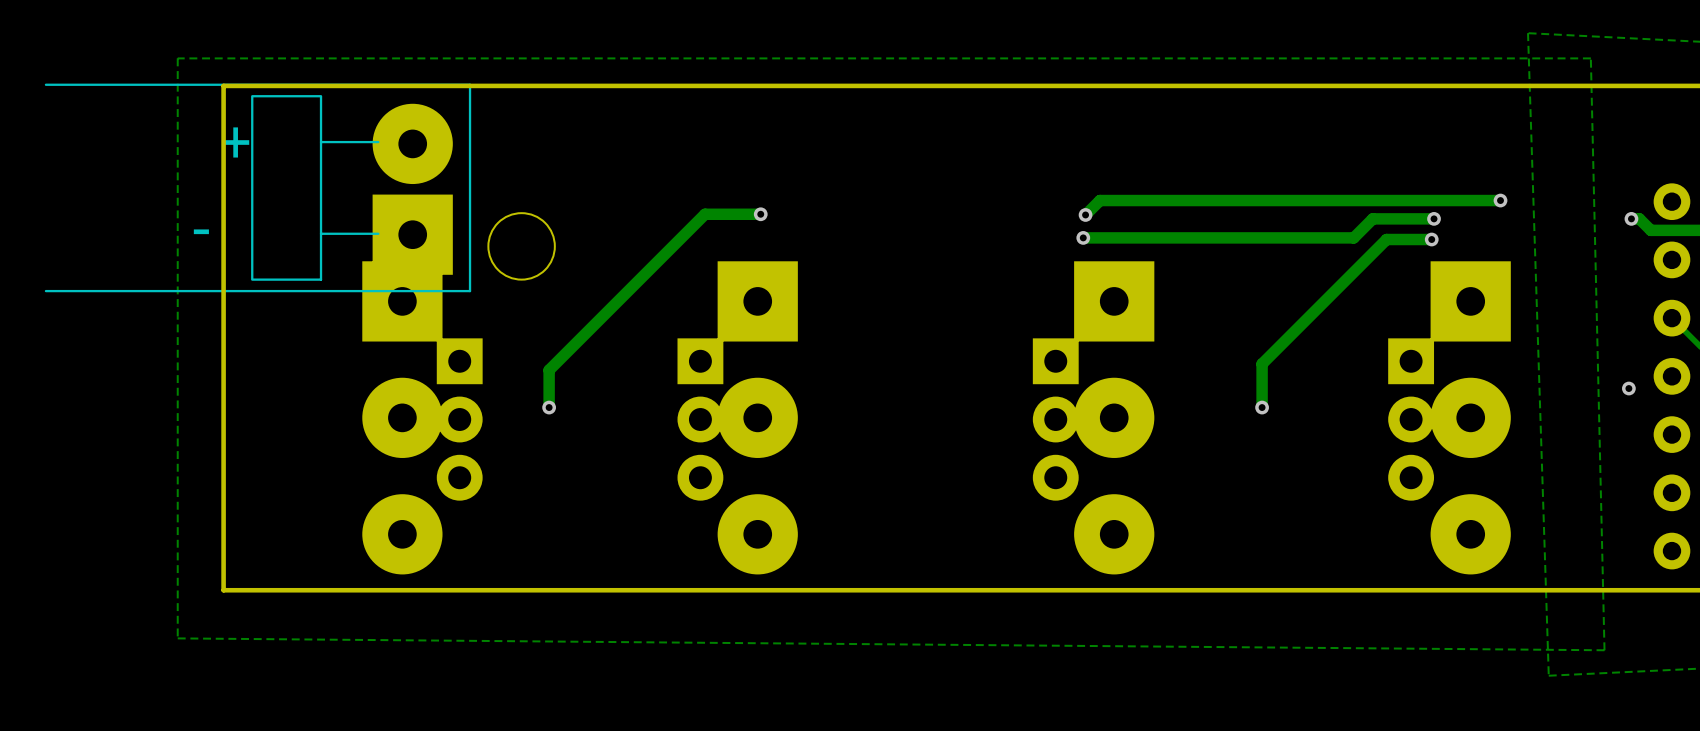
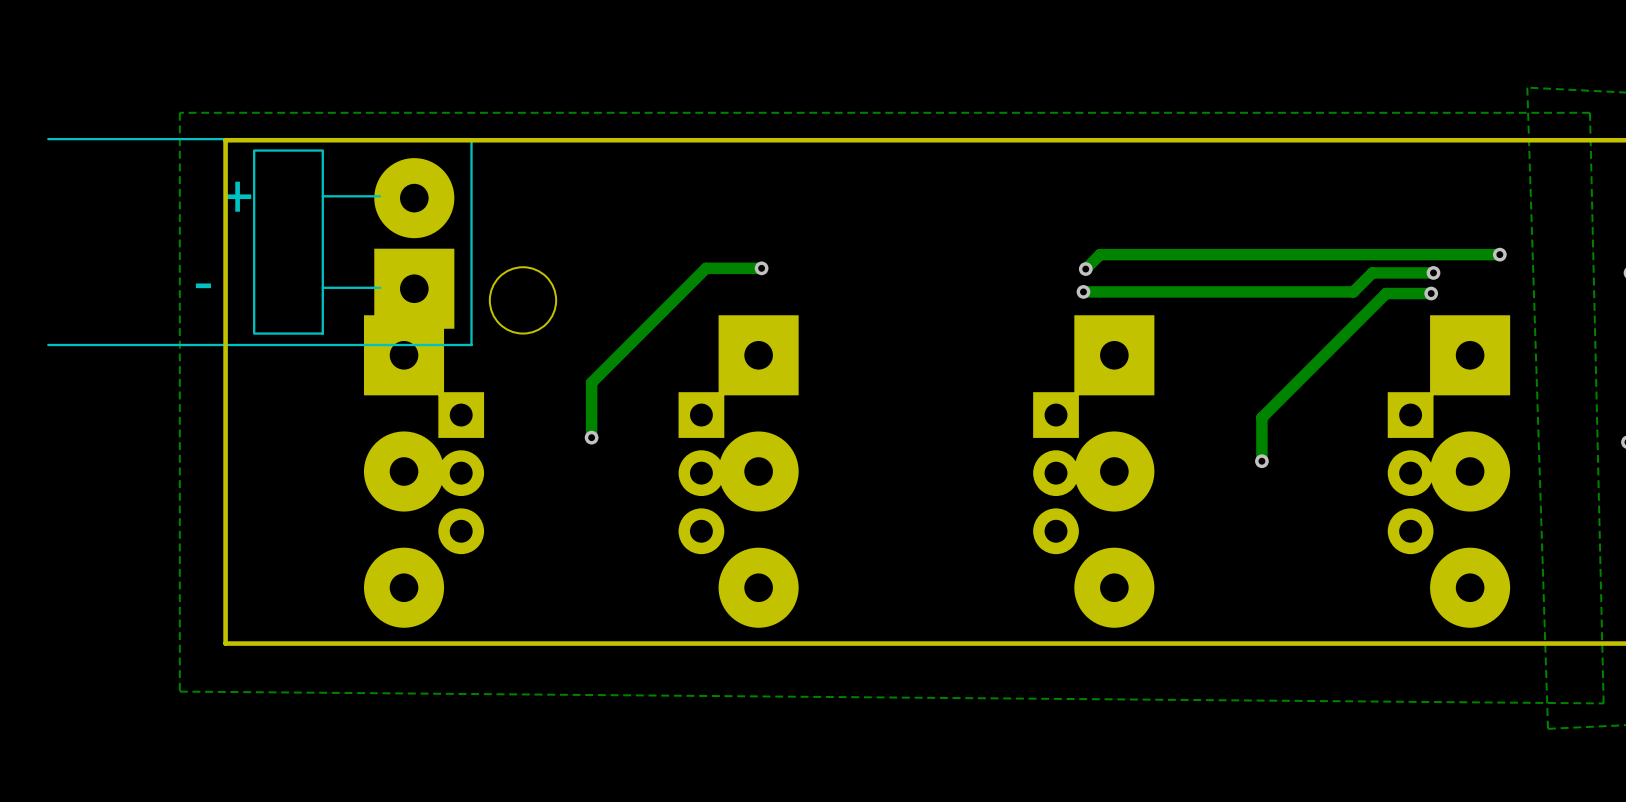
track: (590, 328) (549, 370) (549, 407) -> (591, 382) (591, 437)
via position: (549, 407) -> (591, 437)

